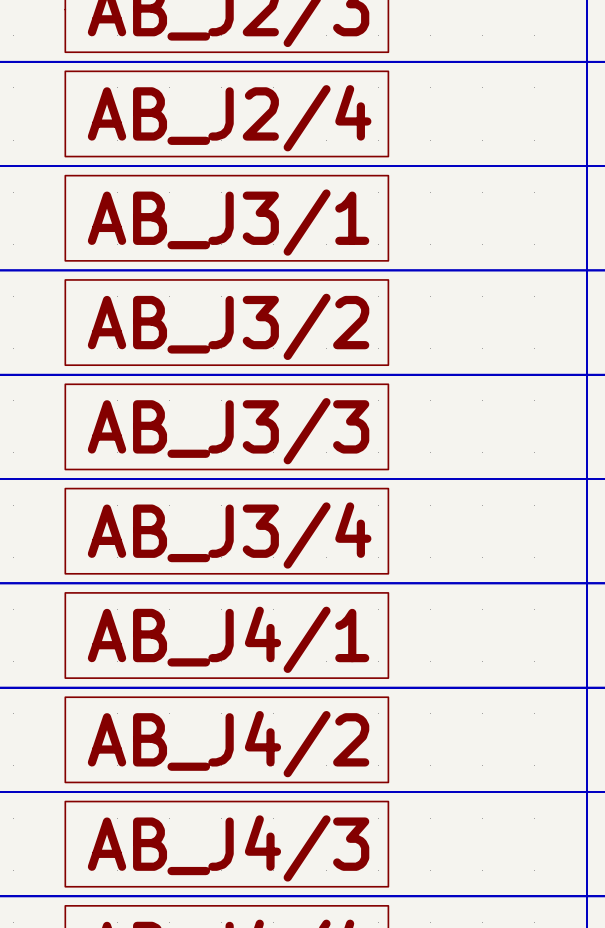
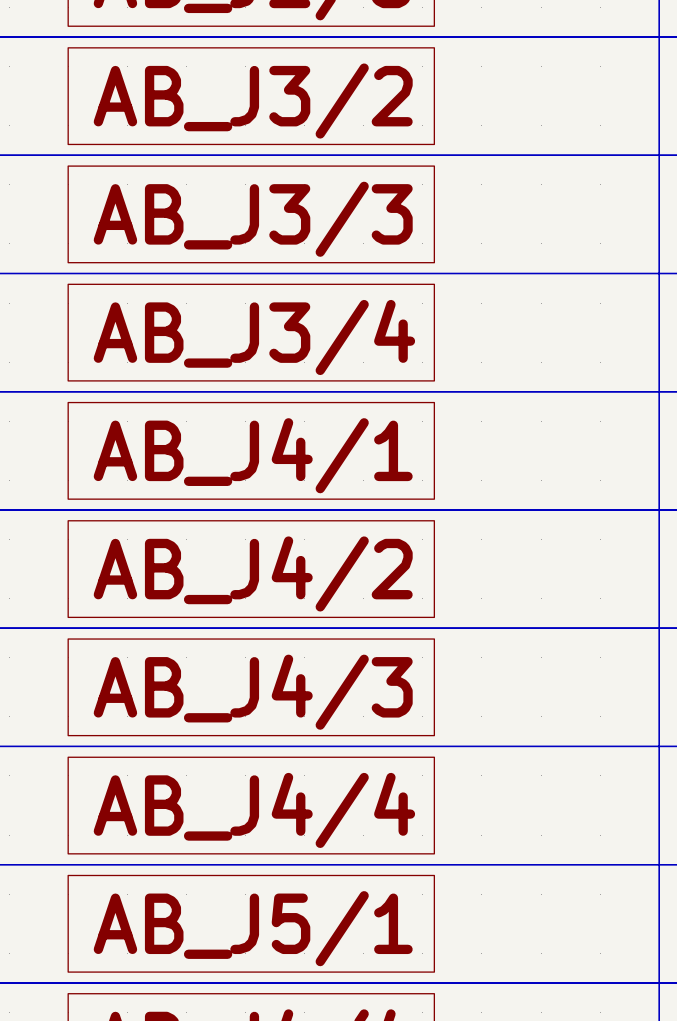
global label: AB_J2/4 (229, 118) -> AB_J3/2 (253, 101)
global label: AB_J3/1 (228, 222) -> AB_J3/3 (253, 219)
global label: AB_J3/2 (228, 326) -> AB_J3/4 (254, 337)
global label: AB_J3/3 (228, 431) -> AB_J4/1 (253, 455)
global label: AB_J3/4 (229, 535) -> AB_J4/2 (253, 573)
global label: AB_J4/1 (228, 639) -> AB_J4/3 (253, 692)
global label: AB_J4/2 (228, 744) -> AB_J4/4 (254, 810)
global label: AB_J4/3 (228, 848) -> AB_J5/1 (253, 928)

